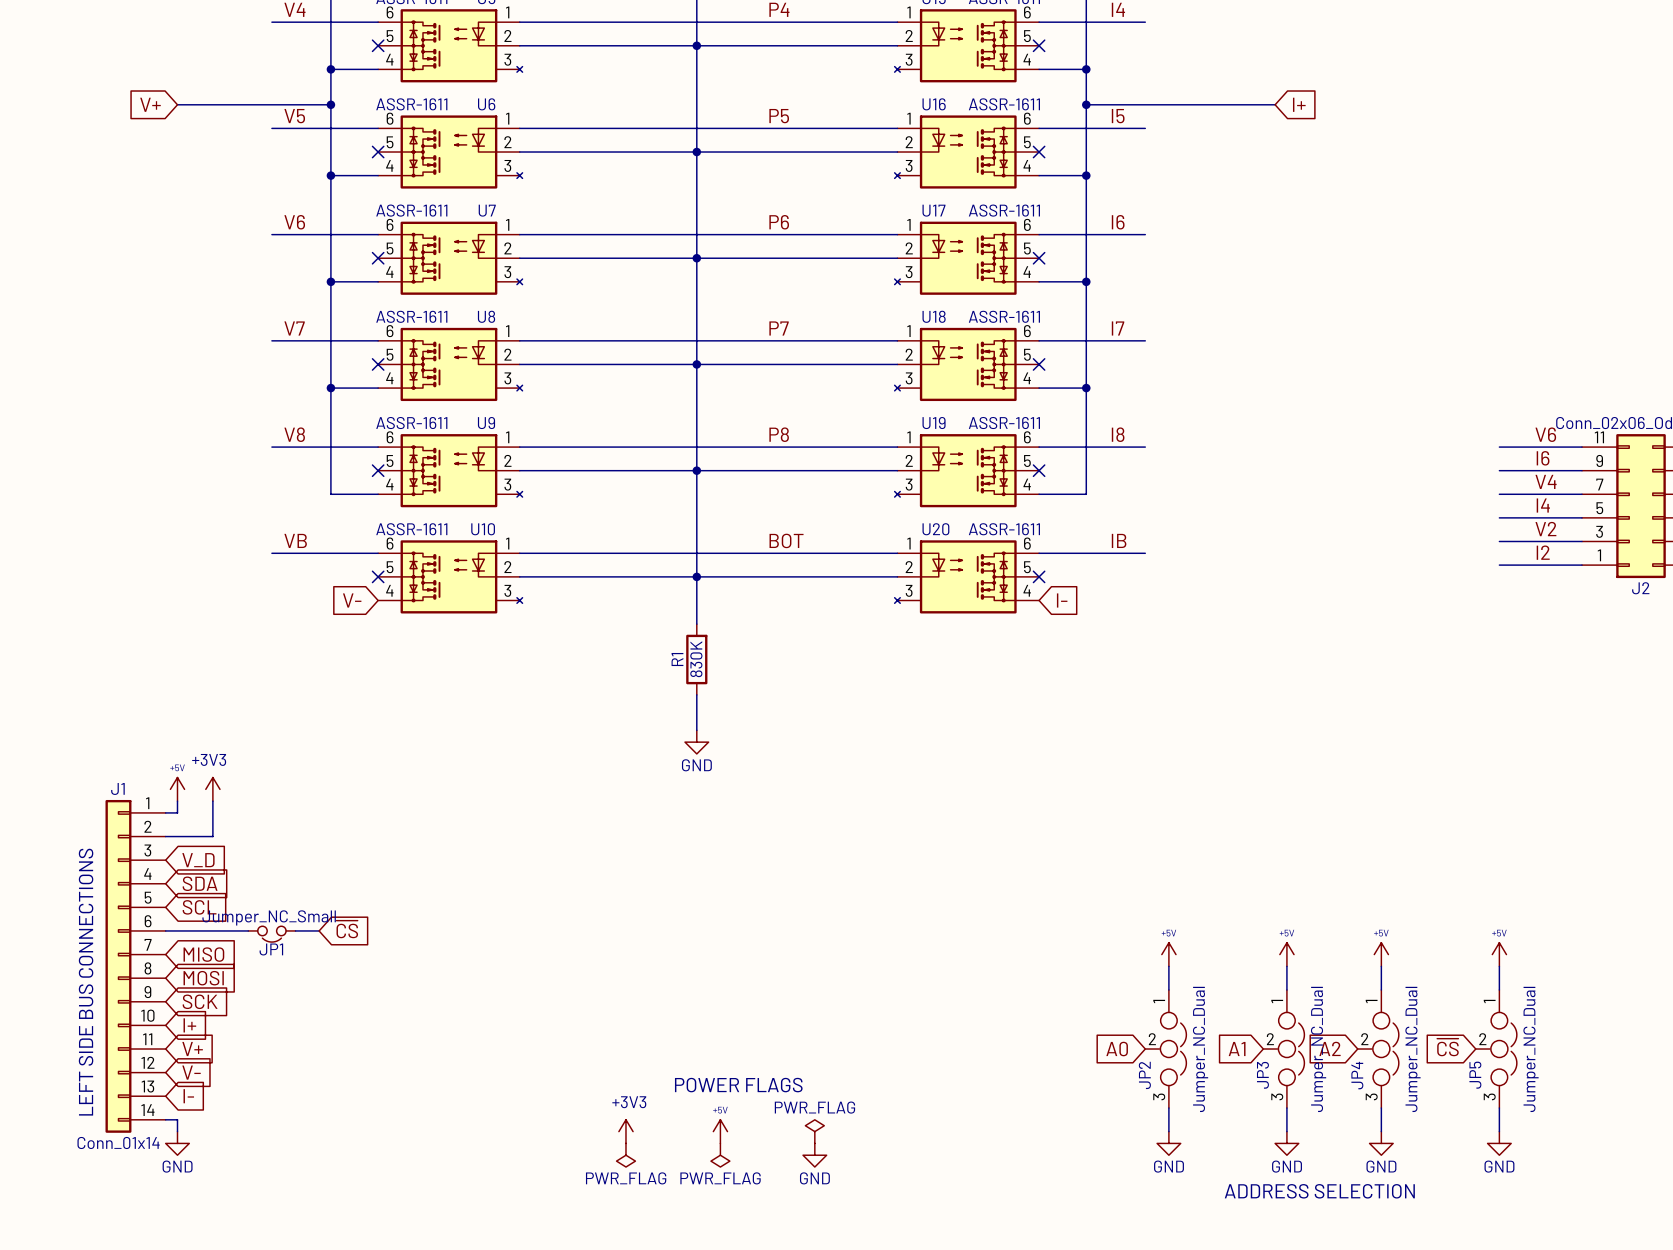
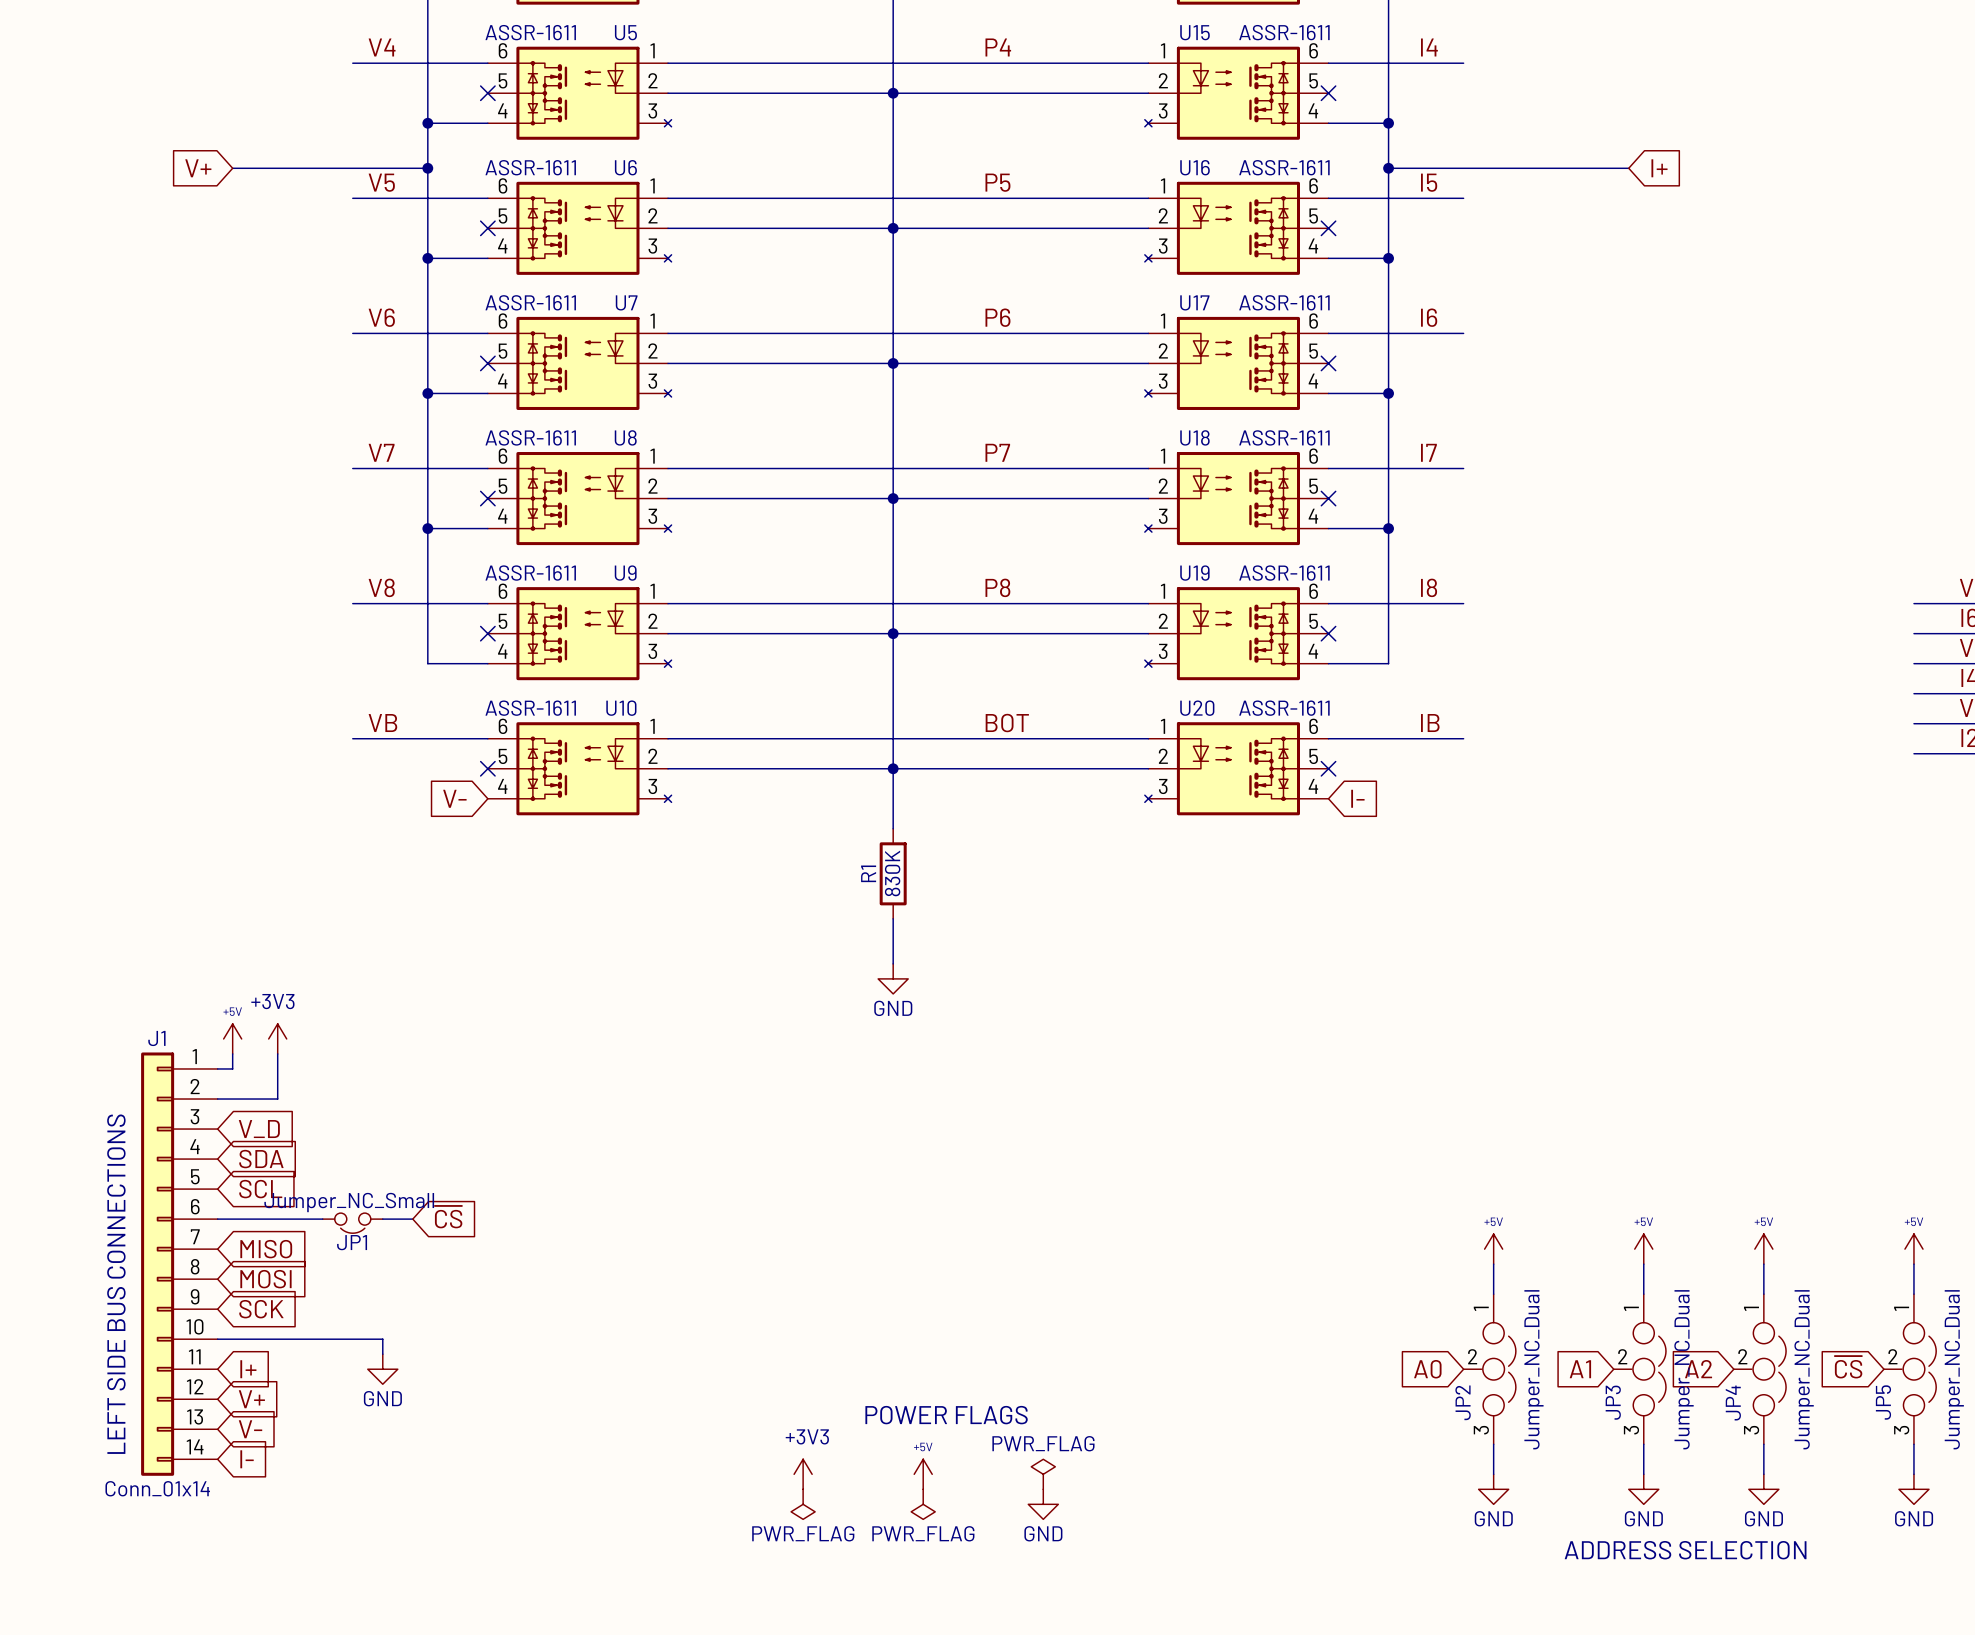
wire: none -> (217, 1339) (382, 1339) (382, 1354)
global label: I+ (189, 1025) -> none
global label: V+ (192, 1049) -> I+ (248, 1369)
global label: V- (191, 1072) -> V+ (251, 1399)
global label: I- (188, 1096) -> V- (250, 1429)
wire: (165, 1119) (177, 1119) (177, 1131) -> none
global label: none -> I- (247, 1459)
power symbol position: GND (177, 1143) -> GND (382, 1369)

